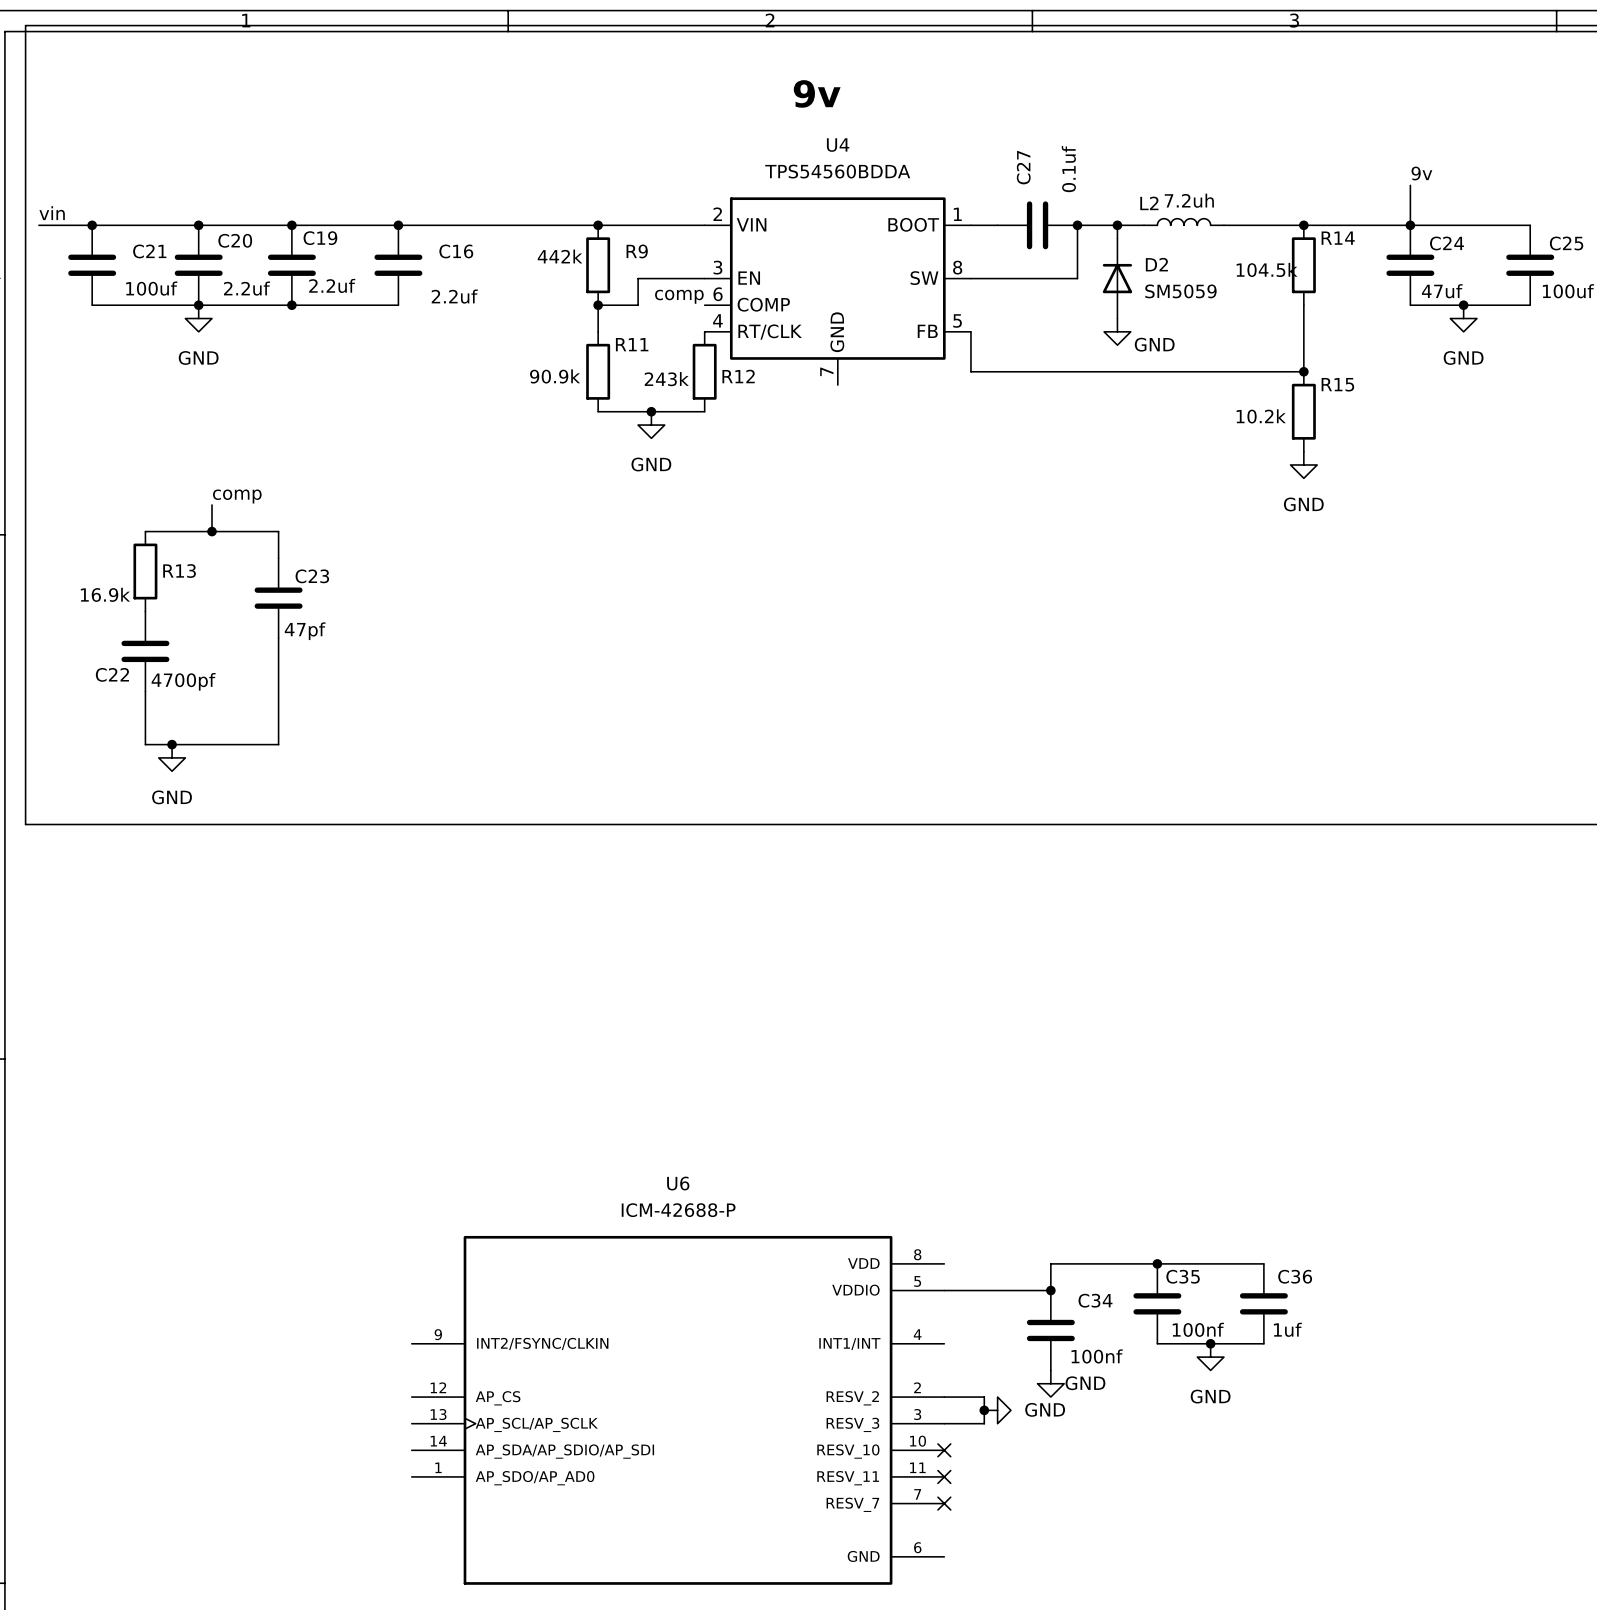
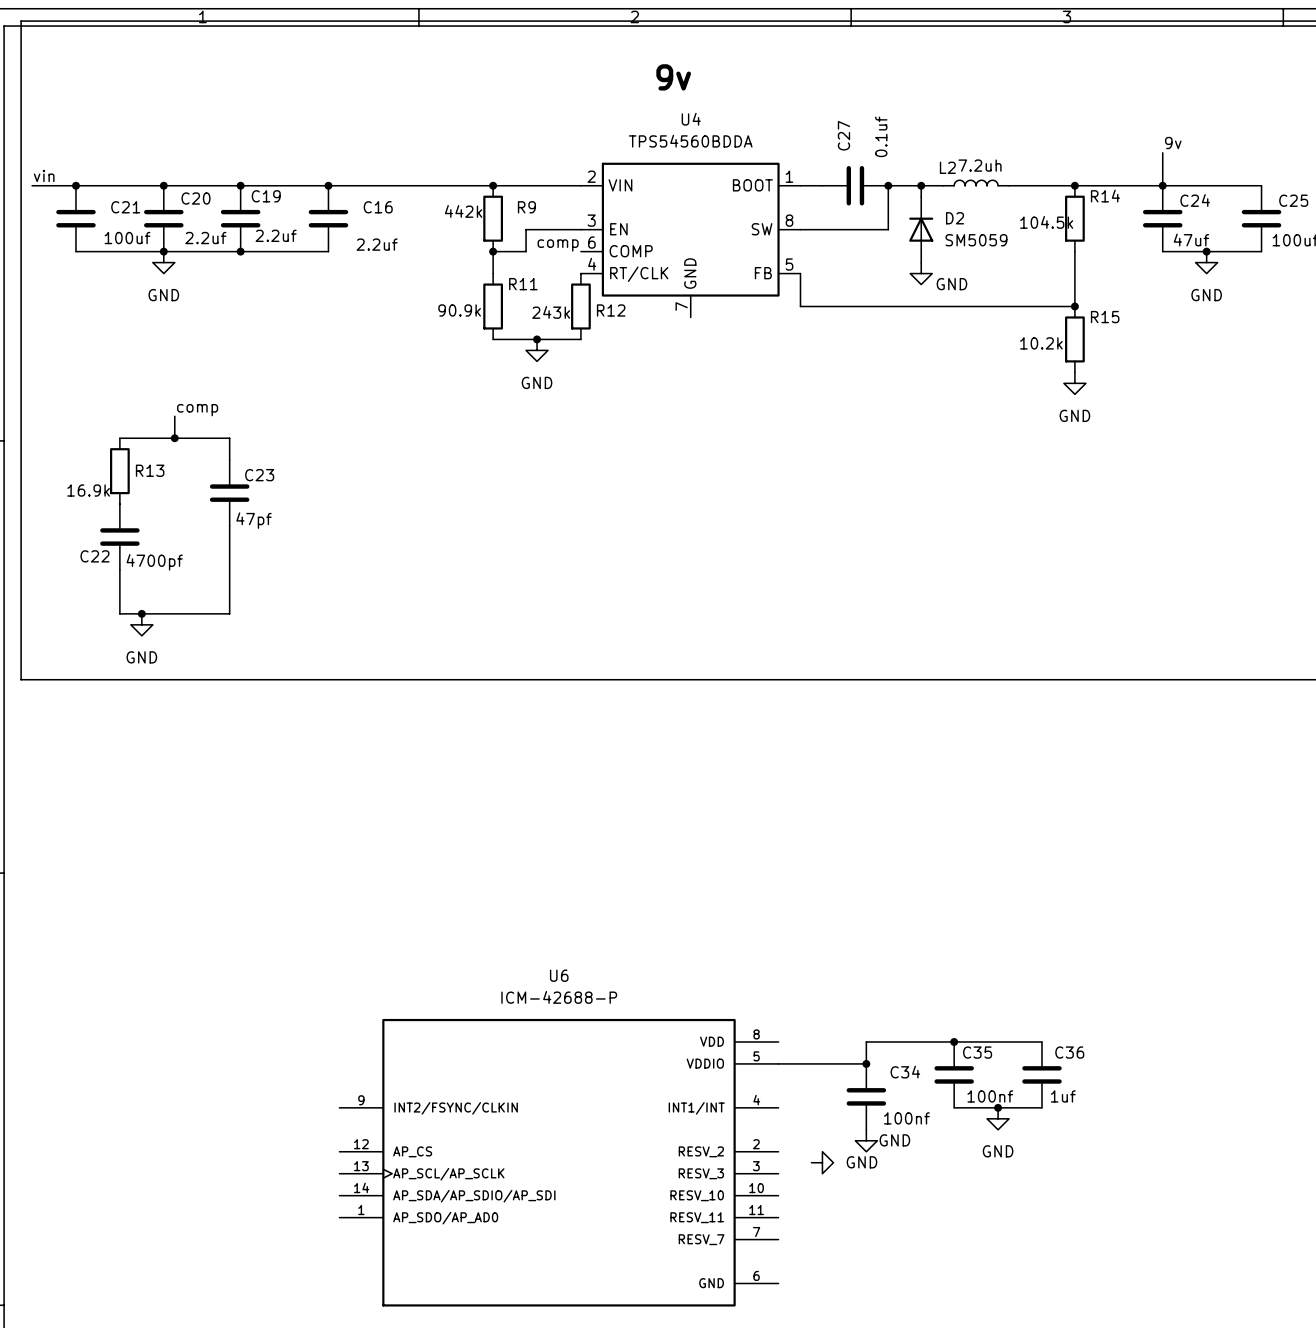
wire: (944, 1397) (984, 1397) (984, 1423) (944, 1423) -> none
junction: (984, 1410) -> none
no-connect mark: (944, 1450) -> none
no-connect mark: (944, 1476) -> none
no-connect mark: (944, 1503) -> none

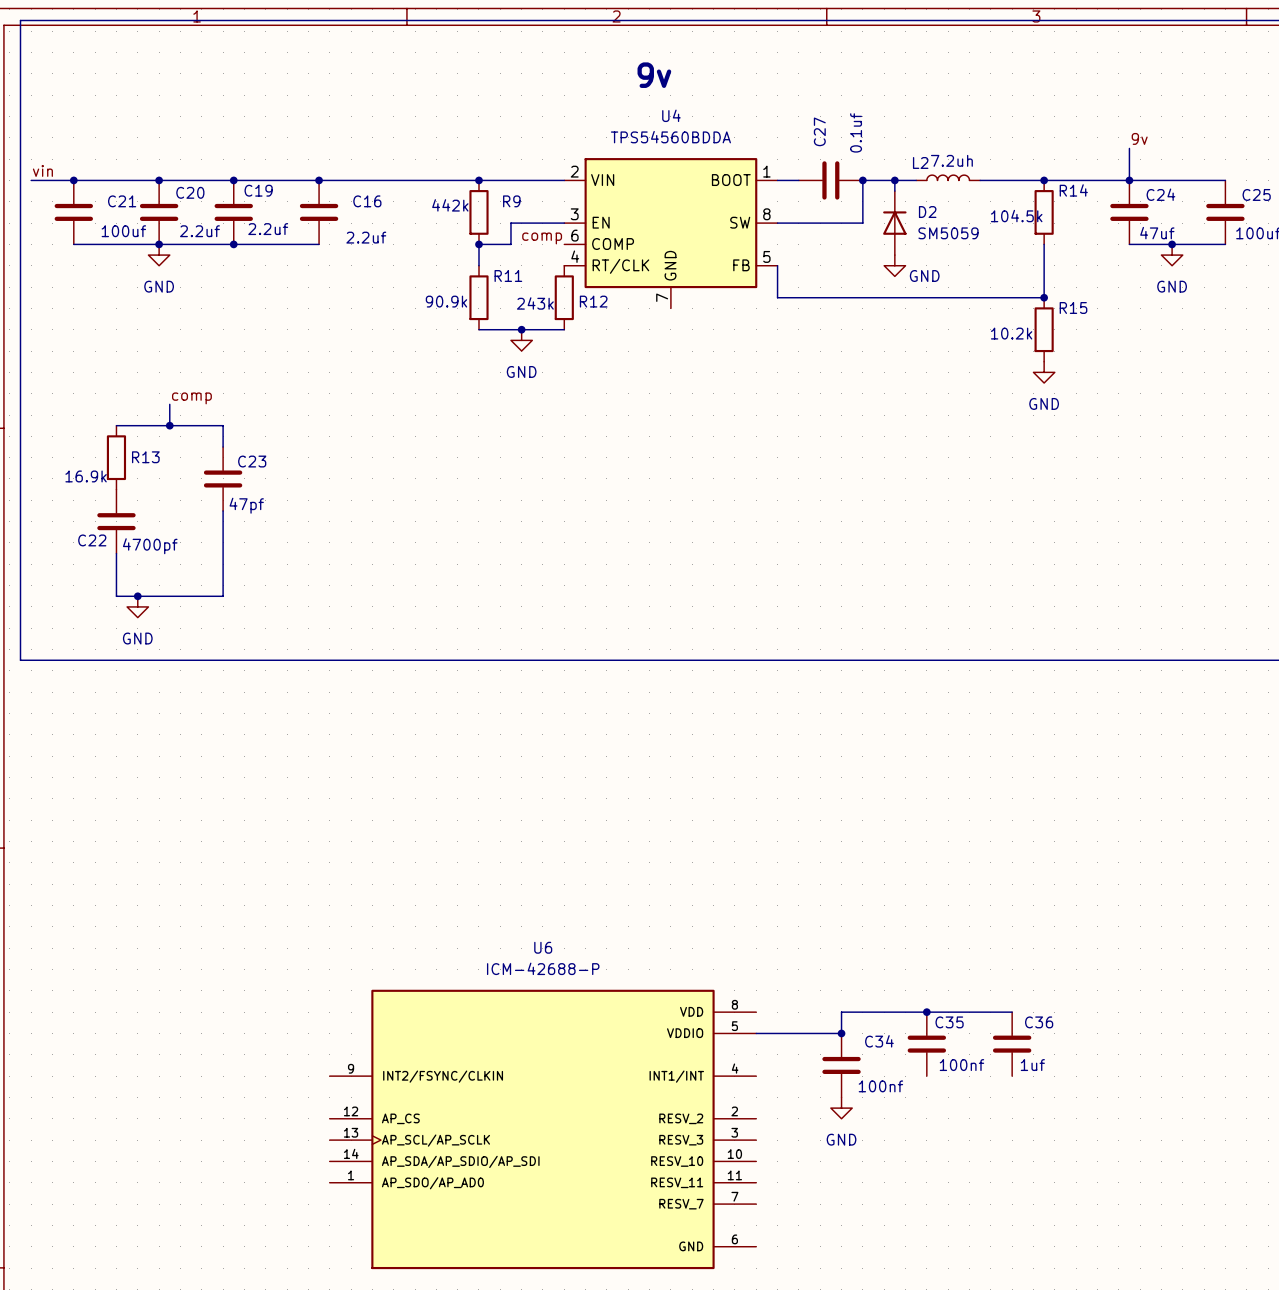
wire: (954, 1107) (1041, 1107) -> none
junction: (998, 1107) -> none
power symbol: GND (998, 1118) -> none
power symbol text position: GND (894, 1140) -> GND (841, 1139)
power symbol: GND (822, 1162) -> none

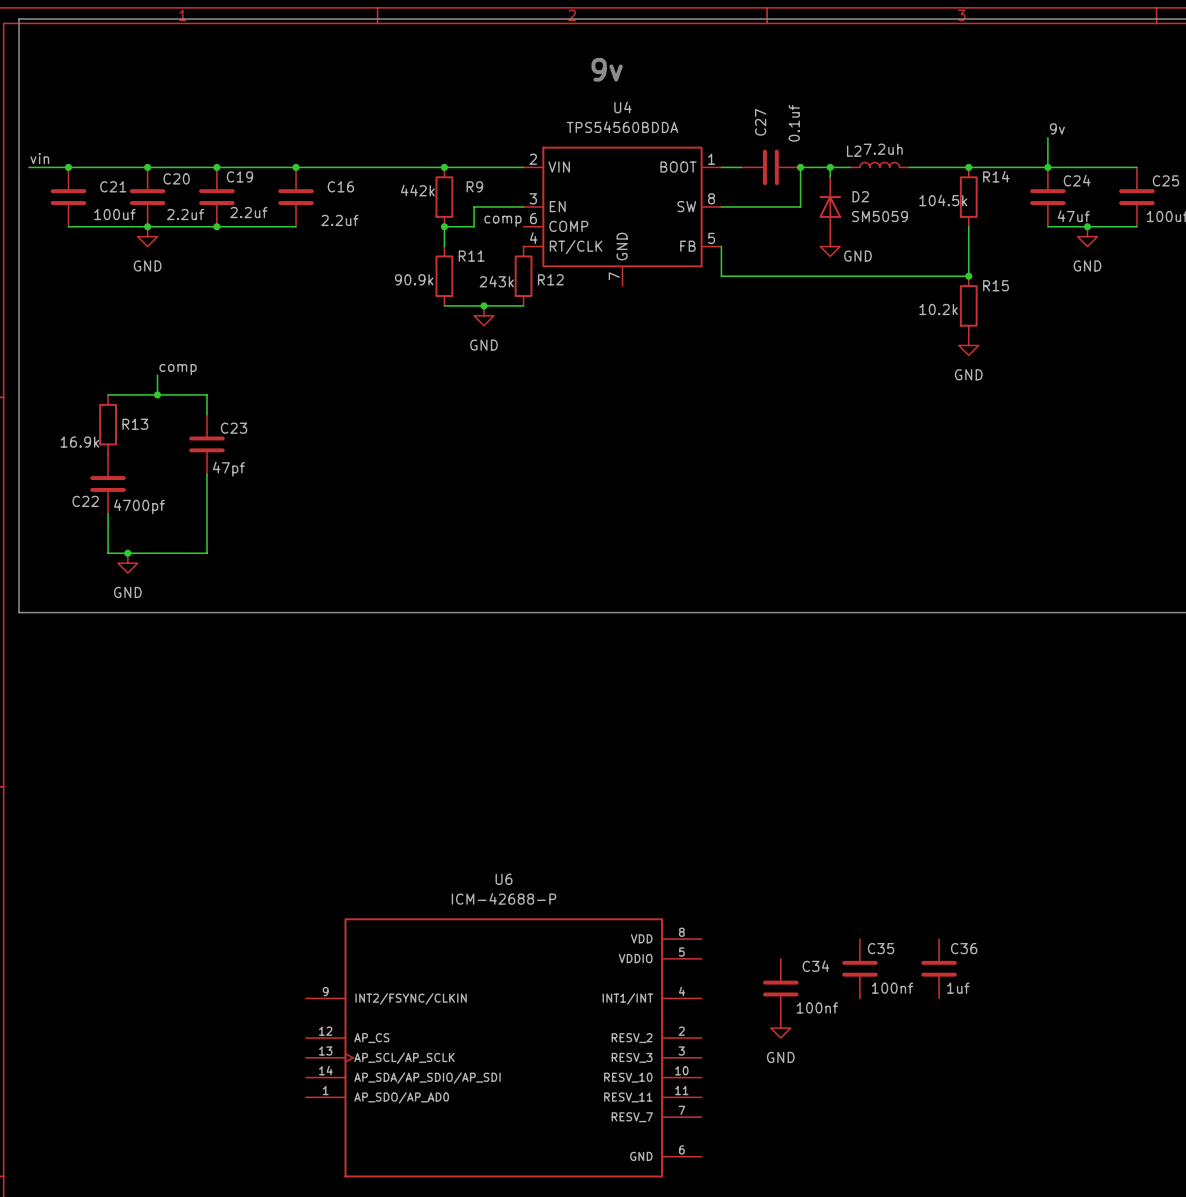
junction: (926, 1012) -> none
wire: (1012, 1012) (841, 1012) (841, 1033) (756, 1033) -> none
junction: (841, 1033) -> none

